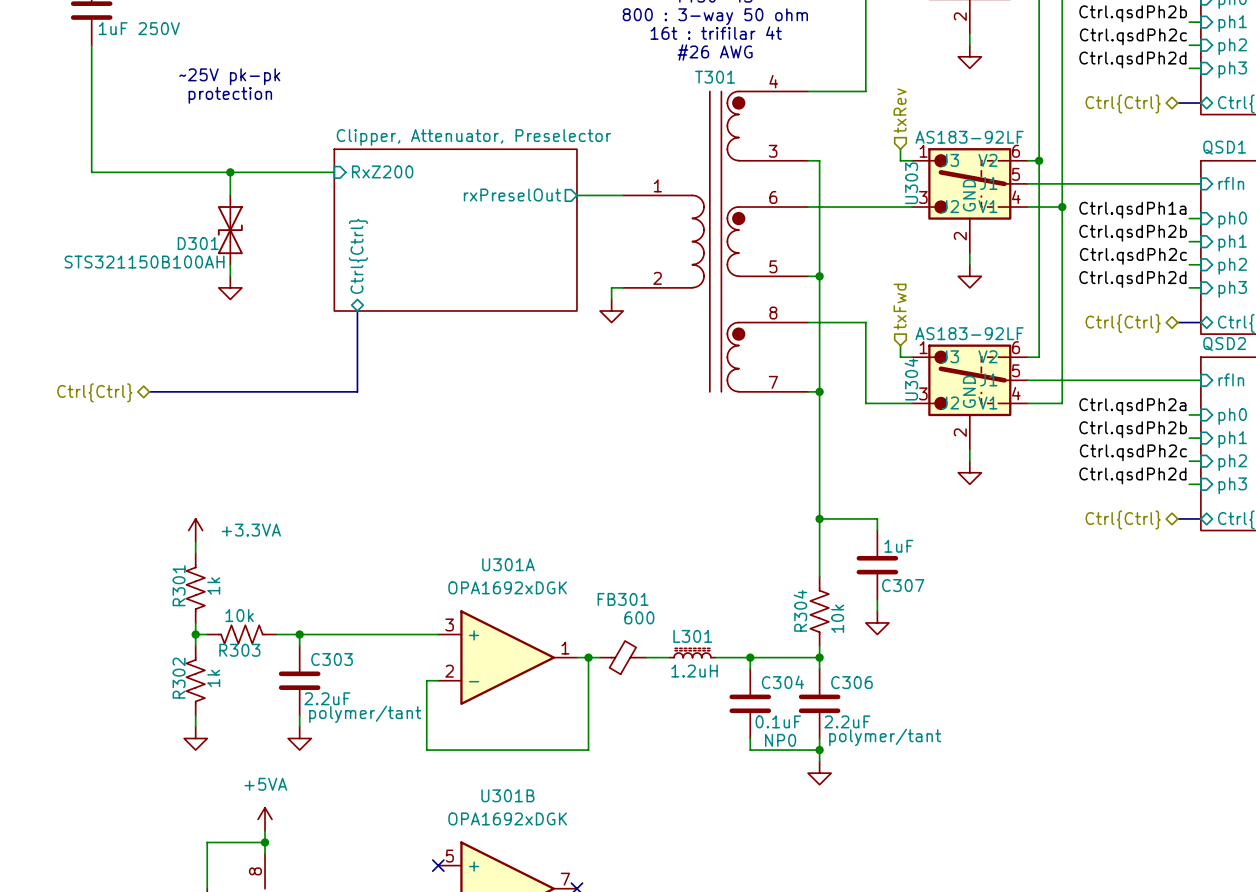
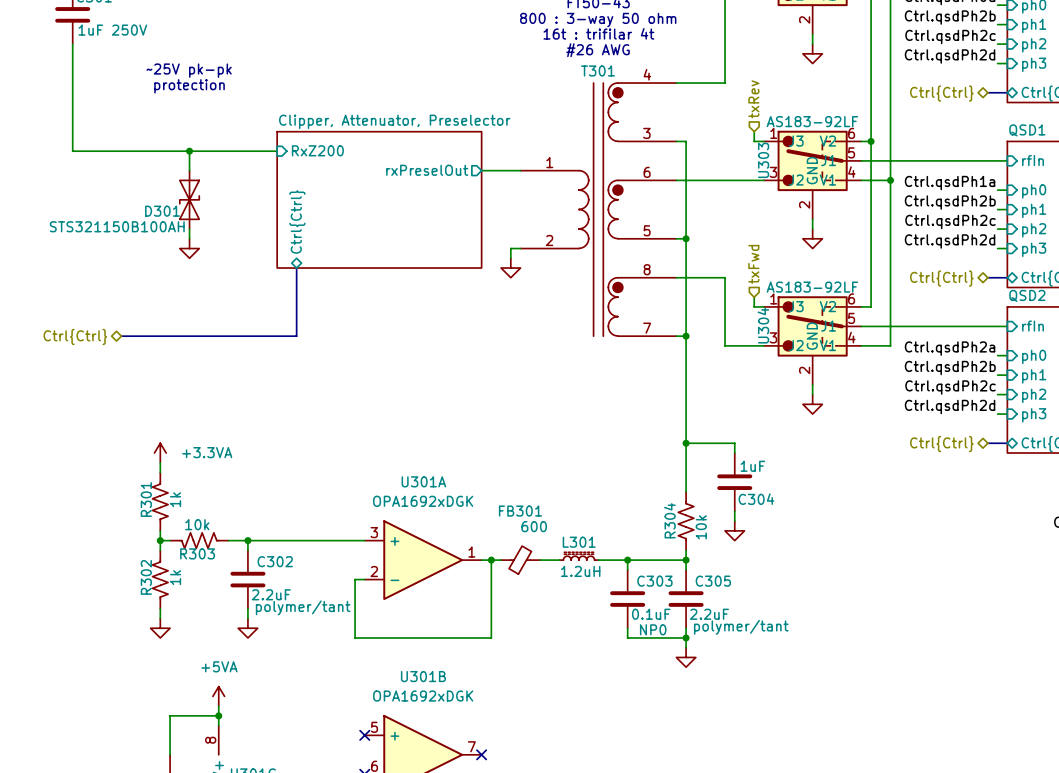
C307 name: C307 (903, 585) -> C304 (756, 499)
C303 name: C303 (332, 659) -> C302 (275, 561)
C304 name: C304 (782, 682) -> C303 (654, 581)
C306 name: C306 (851, 682) -> C305 (713, 581)

